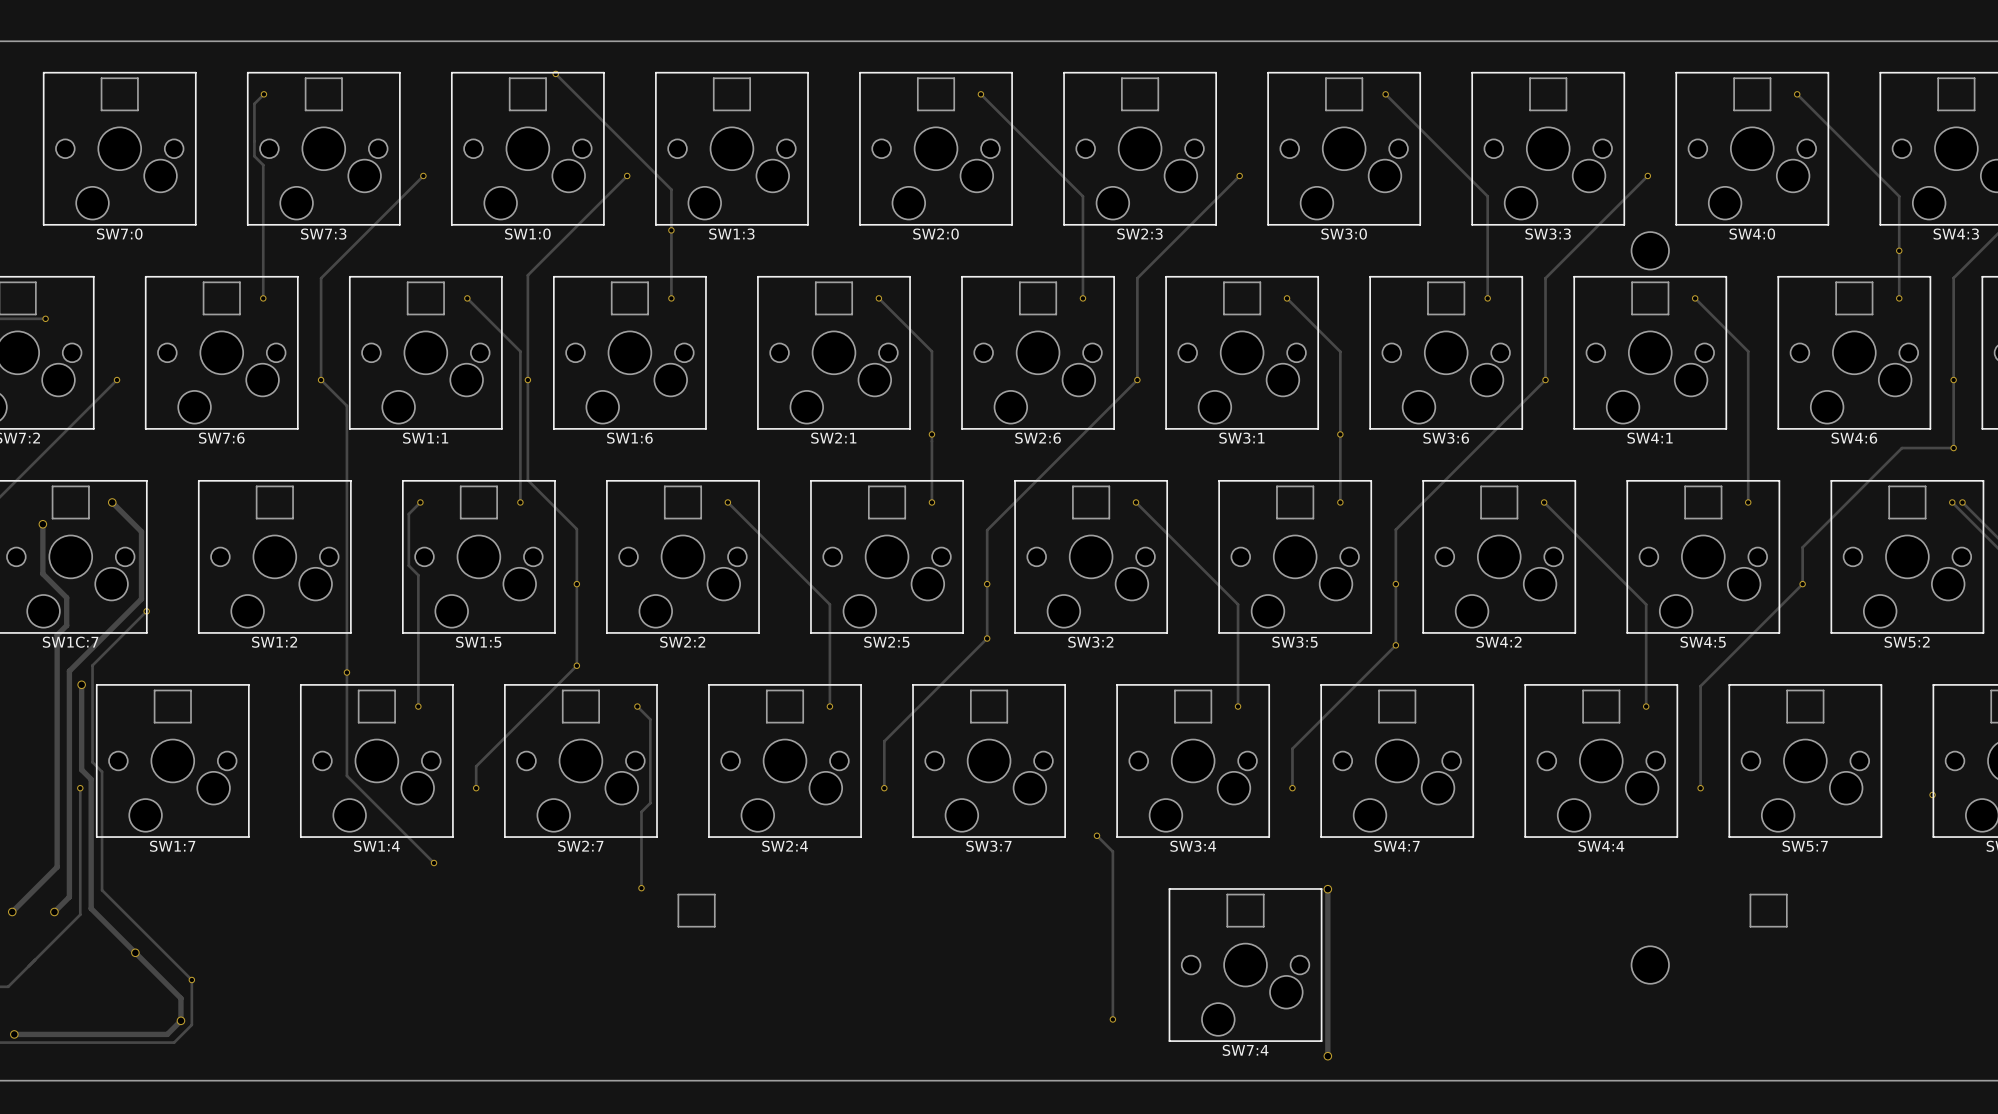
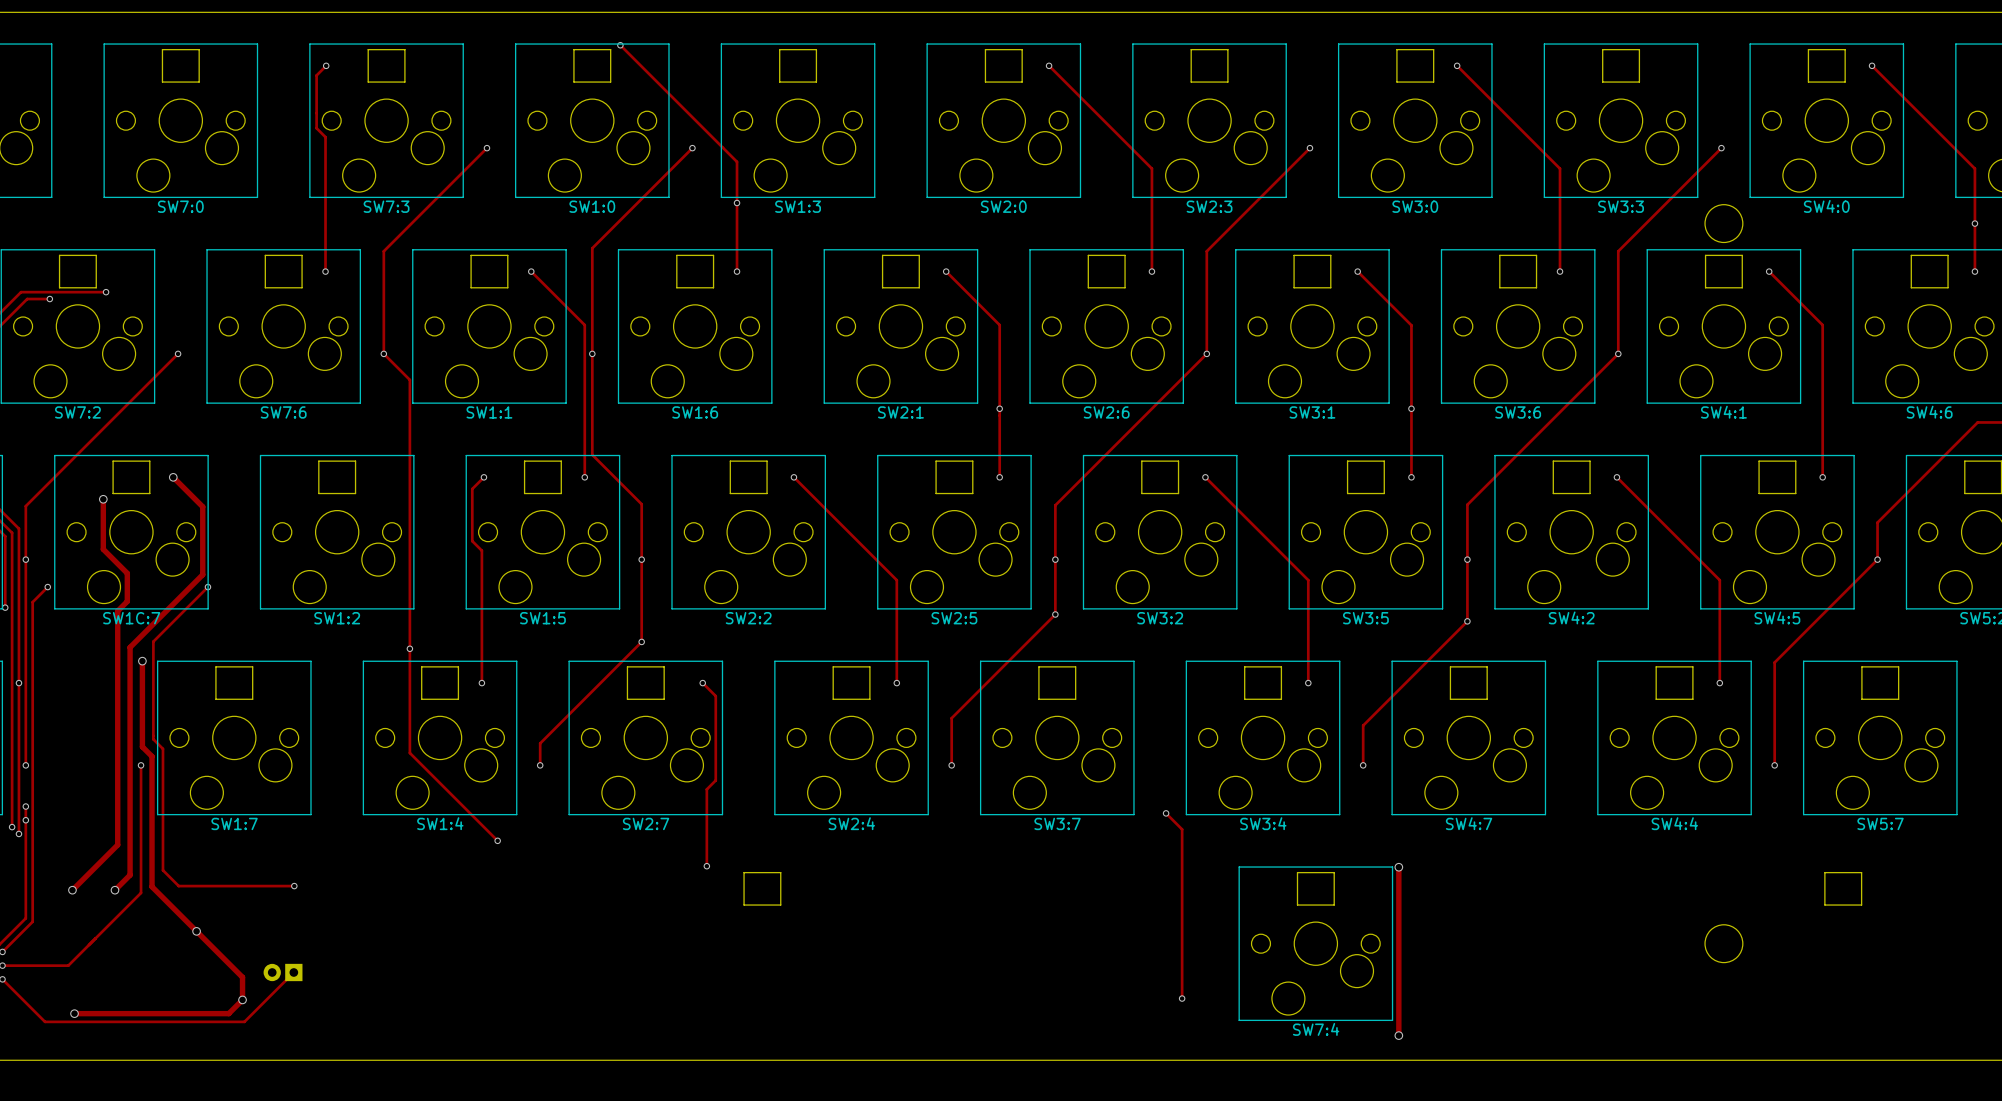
track: (102, 890) (191, 980) (191, 1024) (174, 1042) -> (162, 868) (178, 886) (294, 886)
via: none -> (294, 886)
via: (191, 980) -> none
part: none -> (283, 972)
track: none -> (293, 972) (244, 1021) (235, 1021)

